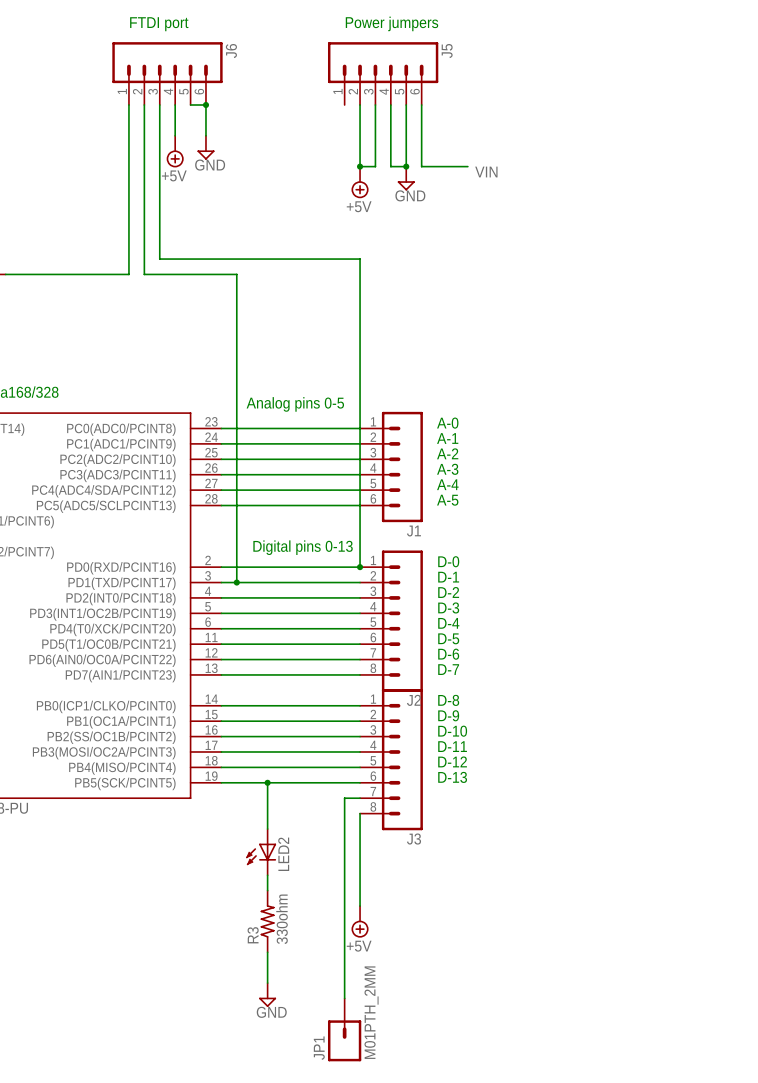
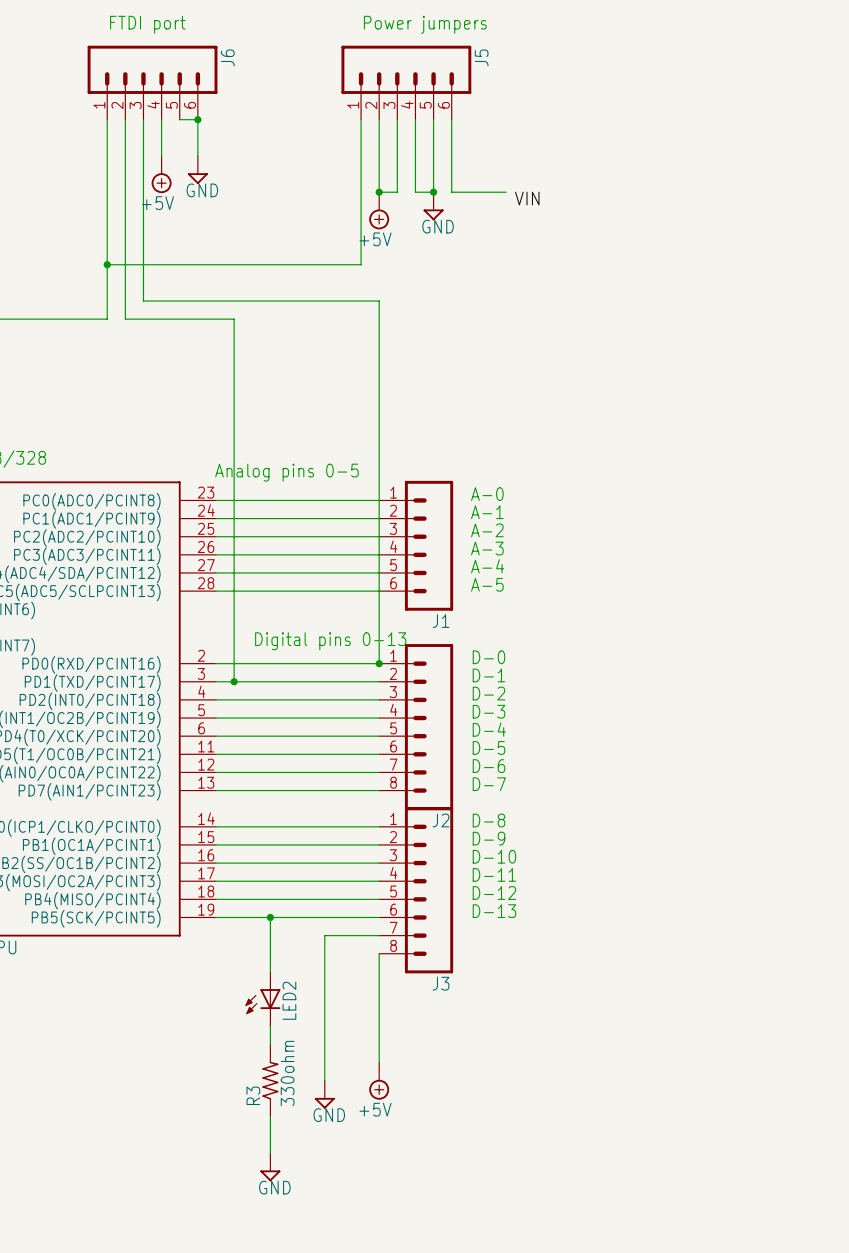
wire: none -> (361, 119) (361, 264) (107, 264)
junction: none -> (107, 264)
wire: (344, 798) (344, 998) -> (361, 935) (324, 935) (324, 1080)
power symbol: none -> GND (324, 1094)
JP1: M01PTH_2MM (344, 1029) -> none

